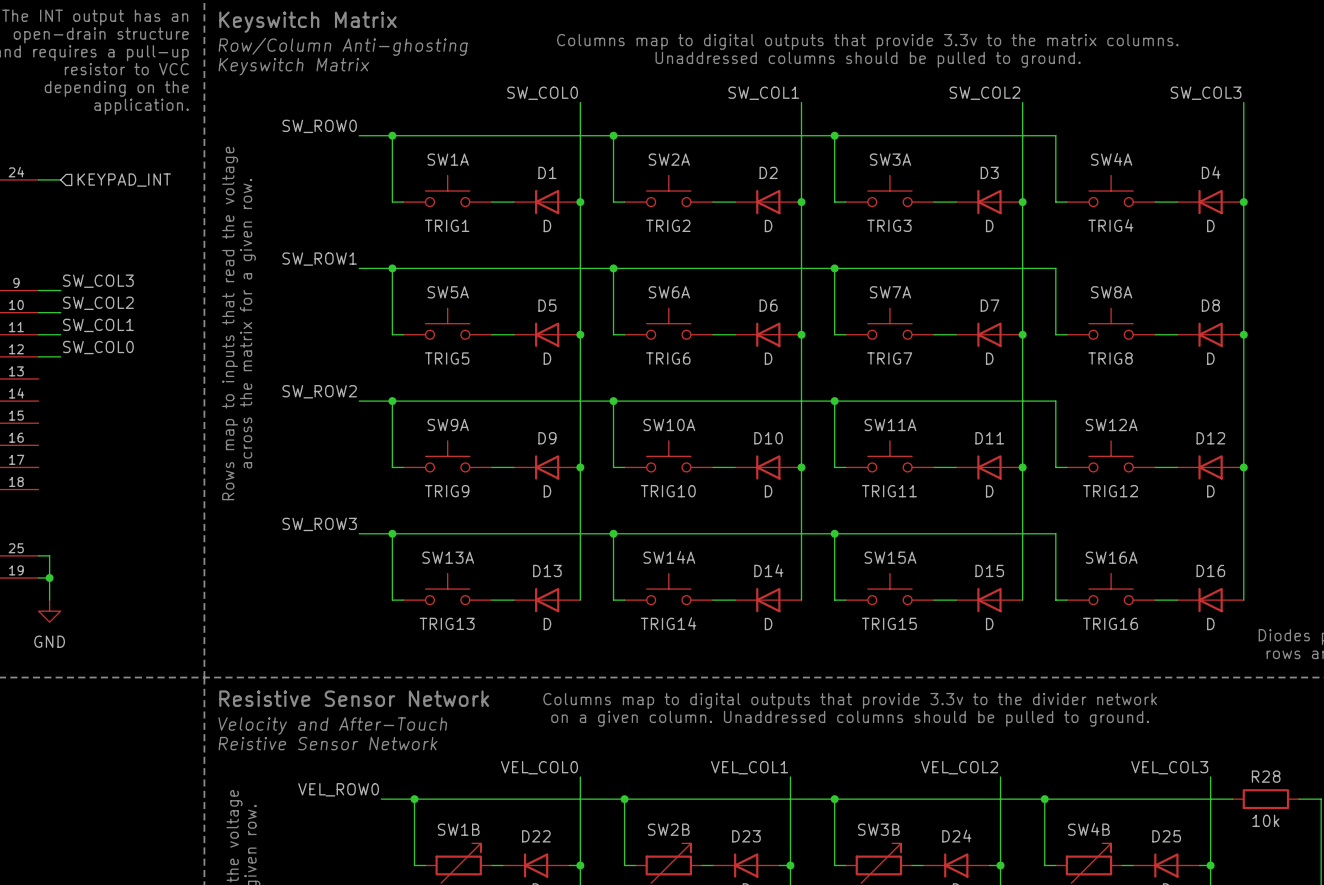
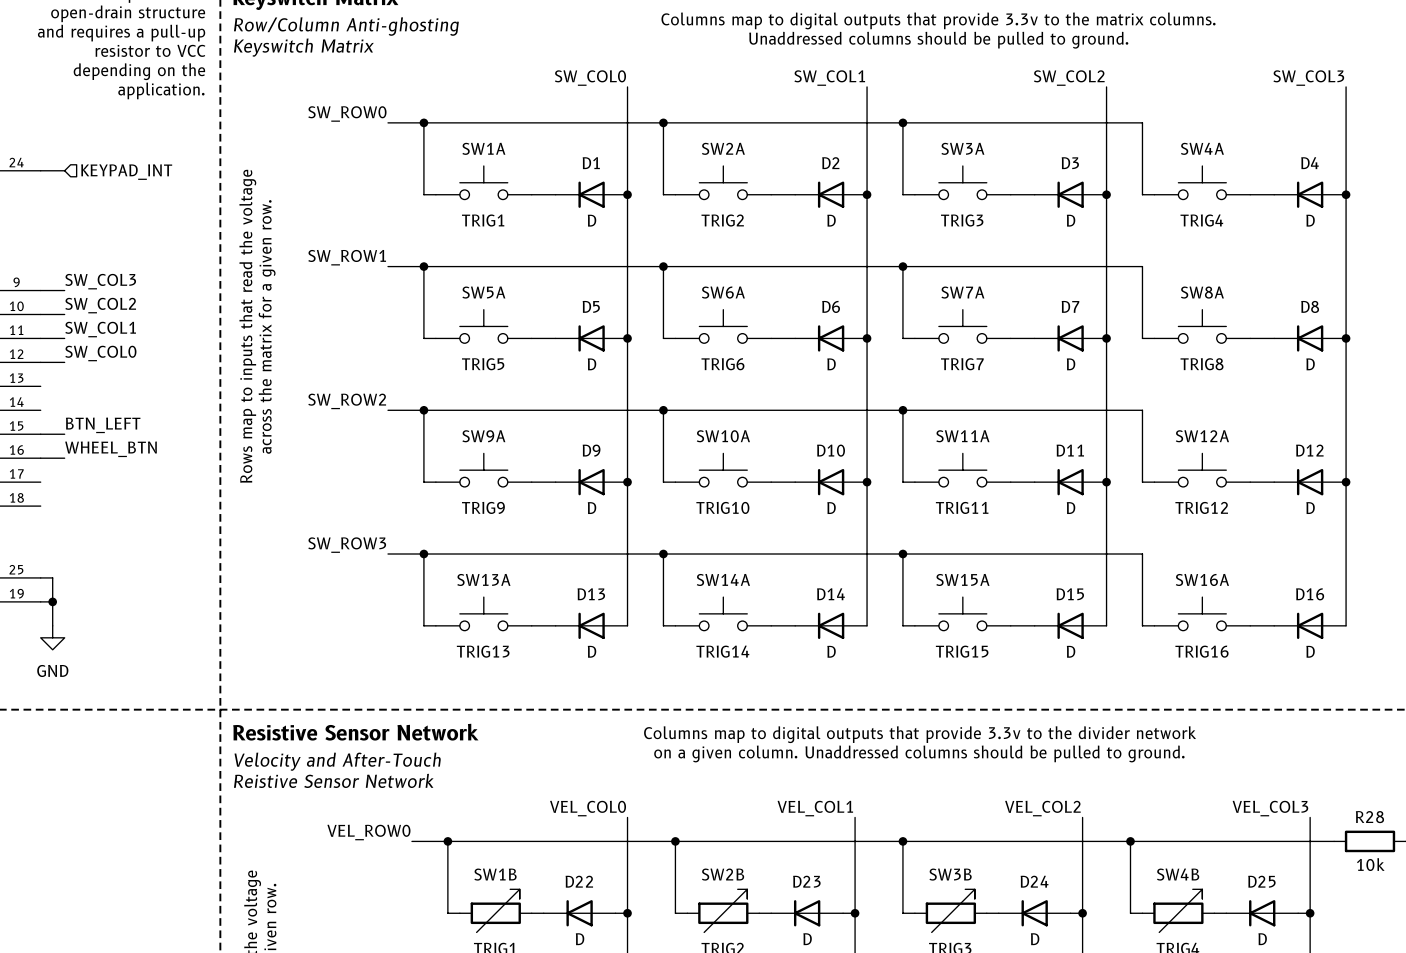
label: none -> BTN_LEFT (103, 425)
wire: none -> (40, 434) (64, 434)
label: none -> WHEEL_BTN (111, 449)
wire: none -> (40, 458) (64, 458)

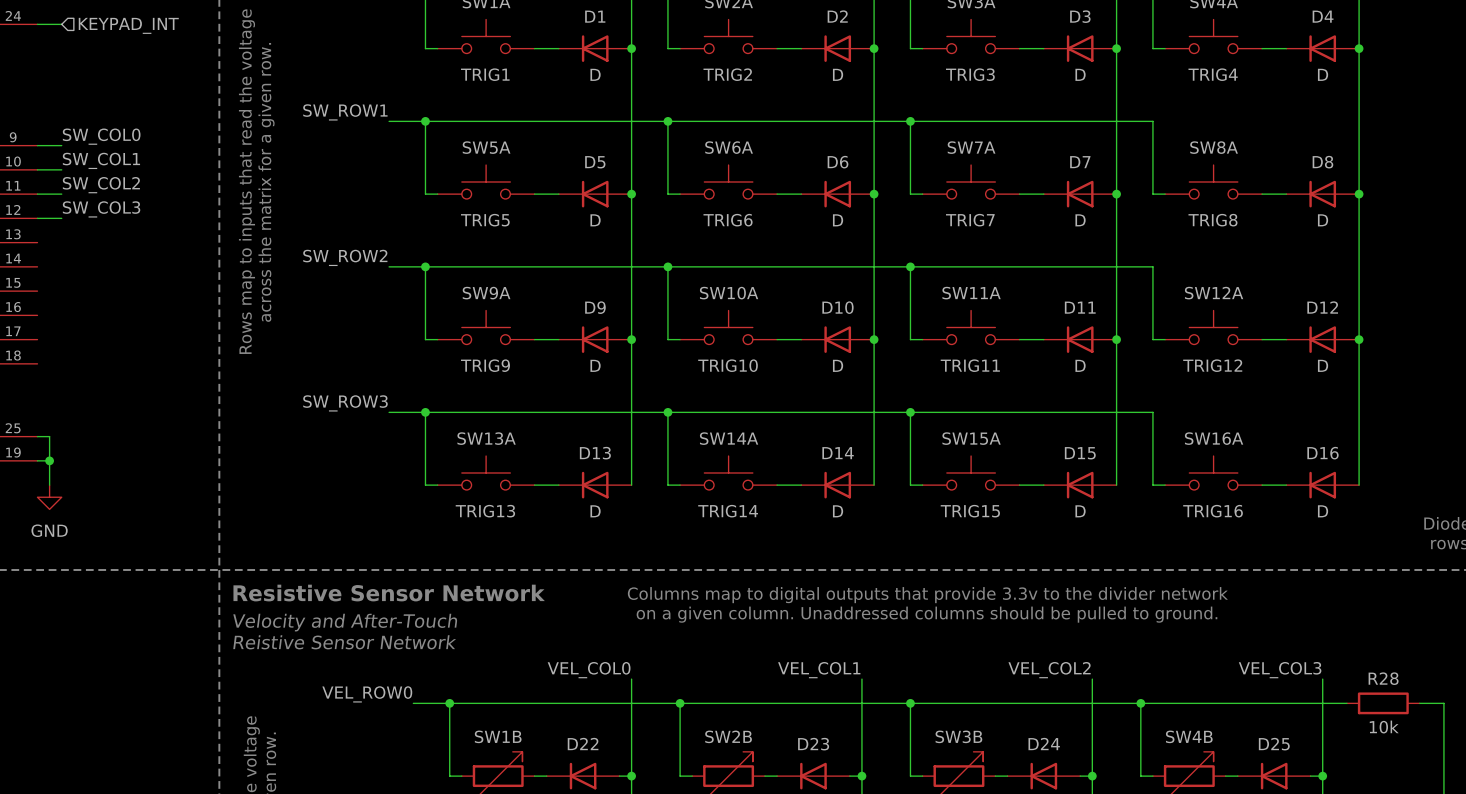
label: SW_COL3 (100, 281) -> SW_COL0 (101, 136)
label: SW_COL2 (100, 305) -> SW_COL1 (101, 160)
label: SW_COL1 (100, 329) -> SW_COL2 (101, 185)
label: SW_COL0 (100, 353) -> SW_COL3 (101, 209)
label: BTN_LEFT (103, 425) -> none
wire: (40, 434) (64, 434) -> none
label: WHEEL_BTN (111, 449) -> none
wire: (40, 458) (64, 458) -> none

